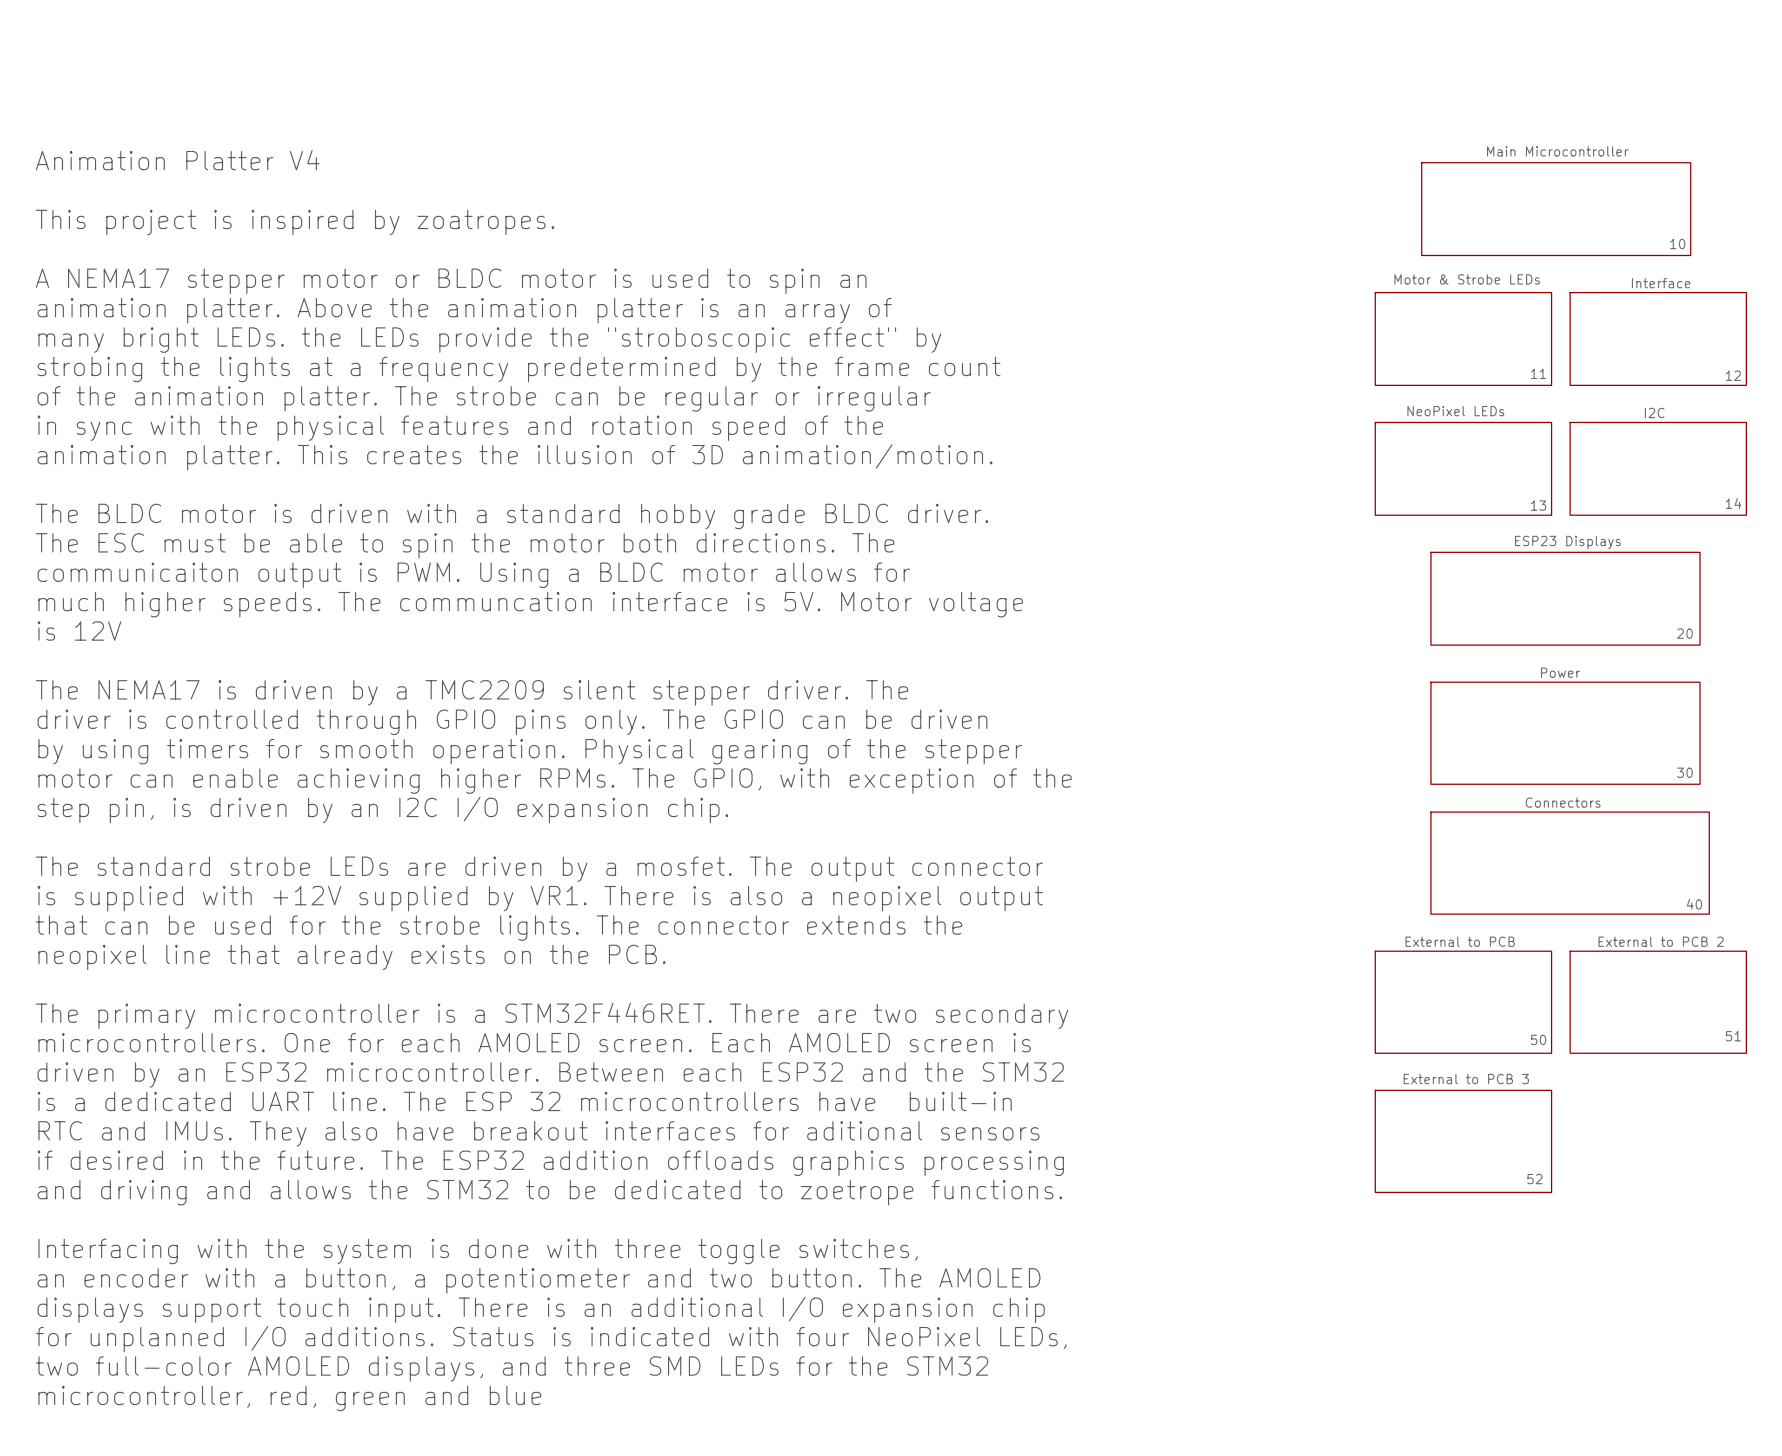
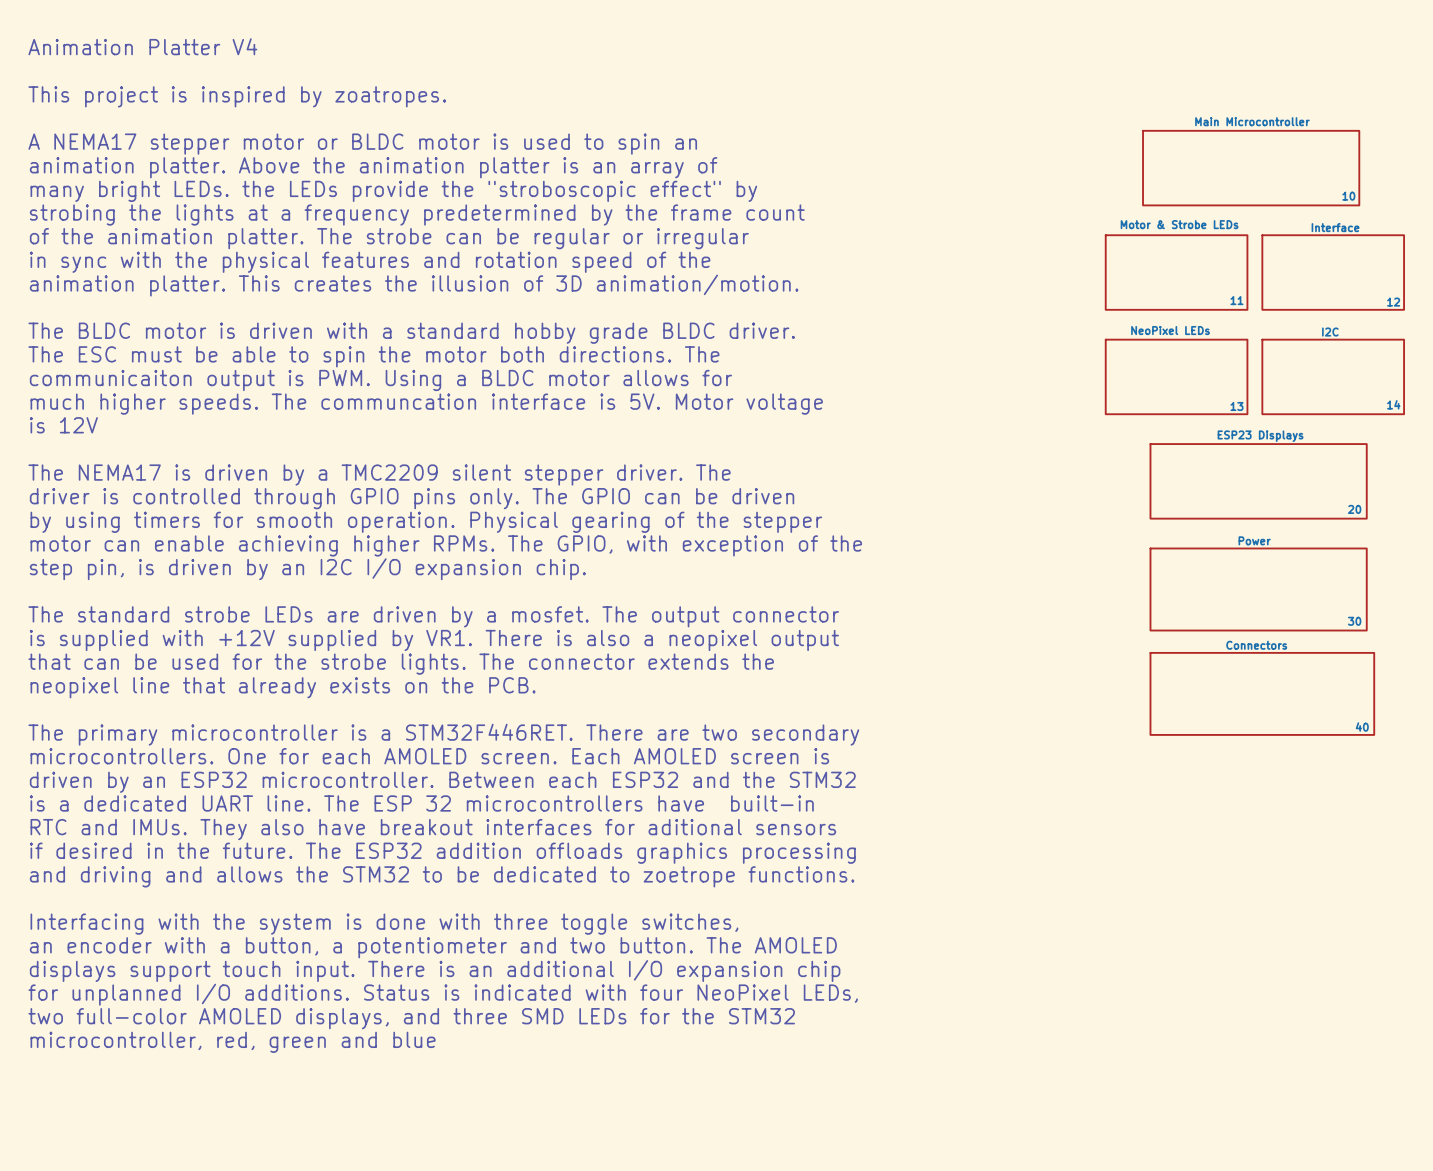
text position: Animation Platter V4 (177, 160) -> Animation Platter V4 (142, 46)
text position: This project is inspired by zoatropes. (295, 222) -> This project is inspired by zoatropes. (237, 96)
text position: A NEMA17 stepper motor or BLDC motor is used to spin an (451, 281) -> A NEMA17 stepper motor or BLDC motor is used to spin an (362, 144)
text position: animation platter. Above the animation platter is an array of (464, 310) -> animation platter. Above the animation platter is an array of (373, 167)
text position: many bright LEDs. the LEDs provide the "stroboscopic effect" by (489, 340) -> many bright LEDs. the LEDs provide the "stroboscopic effect" by (393, 191)
text position: strobing the lights at a frequency predetermined by the frame count (519, 369) -> strobing the lights at a frequency predetermined by the frame count (417, 215)
text position: of the animation platter. The strobe can be regular or irregular (484, 398) -> of the animation platter. The strobe can be regular or irregular (389, 238)
text position: in sync with the physical features and rotation speed of the (460, 428) -> in sync with the physical features and rotation speed of the (370, 262)
text position: animation platter. This creates the illusion of 3D animation/motion. (515, 457) -> animation platter. This creates the illusion of 3D animation/motion. (414, 285)
text position: The BLDC motor is driven with a standard hobby grade BLDC driver. (512, 516) -> The BLDC motor is driven with a standard hobby grade BLDC driver. (411, 333)
text position: The ESC must be able to spin the motor both directions. The (465, 545) -> The ESC must be able to spin the motor both directions. The (373, 356)
text position: communicaiton output is PWM. Using a BLDC motor allows for (473, 575) -> communicaiton output is PWM. Using a BLDC motor allows for (380, 380)
text position: much higher speeds. The communcation interface is 5V. Motor voltage (530, 604) -> much higher speeds. The communcation interface is 5V. Motor voltage (426, 404)
text position: is 12V (79, 631) -> is 12V (63, 425)
text position: The NEMA17 is driven by a TMC2209 silent stepper driver. The (472, 692) -> The NEMA17 is driven by a TMC2209 silent stepper driver. The (379, 475)
text position: driver is controlled through GPIO pins only. The GPIO can be driven (512, 722) -> driver is controlled through GPIO pins only. The GPIO can be driven (412, 498)
text position: by using timers for smooth operation. Physical gearing of the stepper (530, 751) -> by using timers for smooth operation. Physical gearing of the stepper (426, 522)
text position: motor can enable achieving higher RPMs. The GPIO, with exception of the (555, 781) -> motor can enable achieving higher RPMs. The GPIO, with exception of the (446, 545)
text position: step pin, is driven by an I2C I/O expansion chip. (382, 810) -> step pin, is driven by an I2C I/O expansion chip. (307, 569)
text position: The standard strobe LEDs are driven by a mosfet. The output connector (539, 869) -> The standard strobe LEDs are driven by a mosfet. The output connector (433, 616)
text position: is supplied with +12V supplied by VR1. There is also a neopixel output (540, 898) -> is supplied with +12V supplied by VR1. There is also a neopixel output (434, 640)
text position: that can be used for the strobe lights. The connector extends the (499, 928) -> that can be used for the strobe lights. The connector extends the (401, 664)
text position: neopixel line that already exists on the PCB. (352, 957) -> neopixel line that already exists on the PCB. (283, 687)
sheet External to PCB: (1463, 1002) -> none
sheet External to PCB 2: (1658, 1002) -> none
text position: The primary microcontroller is a STM32F446RET. There are two secondary (552, 1015) -> The primary microcontroller is a STM32F446RET. There are two secondary (443, 734)
text position: microcontrollers. One for each AMOLED screen. Each AMOLED screen is (534, 1042) -> microcontrollers. One for each AMOLED screen. Each AMOLED screen is (429, 756)
text position: driven by an ESP32 microcontroller. Between each ESP32 and the STM32 (550, 1075) -> driven by an ESP32 microcontroller. Between each ESP32 and the STM32 (442, 782)
text position: is a dedicated UART line. The ESP 32 microcontrollers have built-in (524, 1101) -> is a dedicated UART line. The ESP 32 microcontrollers have built-in (421, 803)
text position: RTC and IMUs. They also have breakout interfaces for aditional sensors (539, 1133) -> RTC and IMUs. They also have breakout interfaces for aditional sensors (433, 829)
sheet External to PCB 3: (1463, 1141) -> none
text position: if desired in the future. The ESP32 addition offloads graphics processing (550, 1163) -> if desired in the future. The ESP32 addition offloads graphics processing (442, 853)
text position: and driving and allows the STM32 to be dedicated to zoetrope functions. (549, 1192) -> and driving and allows the STM32 to be dedicated to zoetrope functions. (442, 876)
text position: Interfacing with the system is done with three toggle switches, (478, 1251) -> Interfacing with the system is done with three toggle switches, (384, 924)
text position: an encoder with a button, a potentiometer and two button. The AMOLED (539, 1280) -> an encoder with a button, a potentiometer and two button. The AMOLED (433, 947)
text position: displays support touch input. There is an additional I/O expansion chip (541, 1309) -> displays support touch input. There is an additional I/O expansion chip (435, 971)
text position: for unplanned I/O additions. Status is indicated with four NeoPixel LEDs, (551, 1339) -> for unplanned I/O additions. Status is indicated with four NeoPixel LEDs, (443, 994)
text position: two full-color AMOLED displays, and three SMD LEDs for the STM32 (512, 1369) -> two full-color AMOLED displays, and three SMD LEDs for the STM32 (411, 1018)
text position: microcontroller, red, green and blue (289, 1398) -> microcontroller, red, green and blue (233, 1042)

